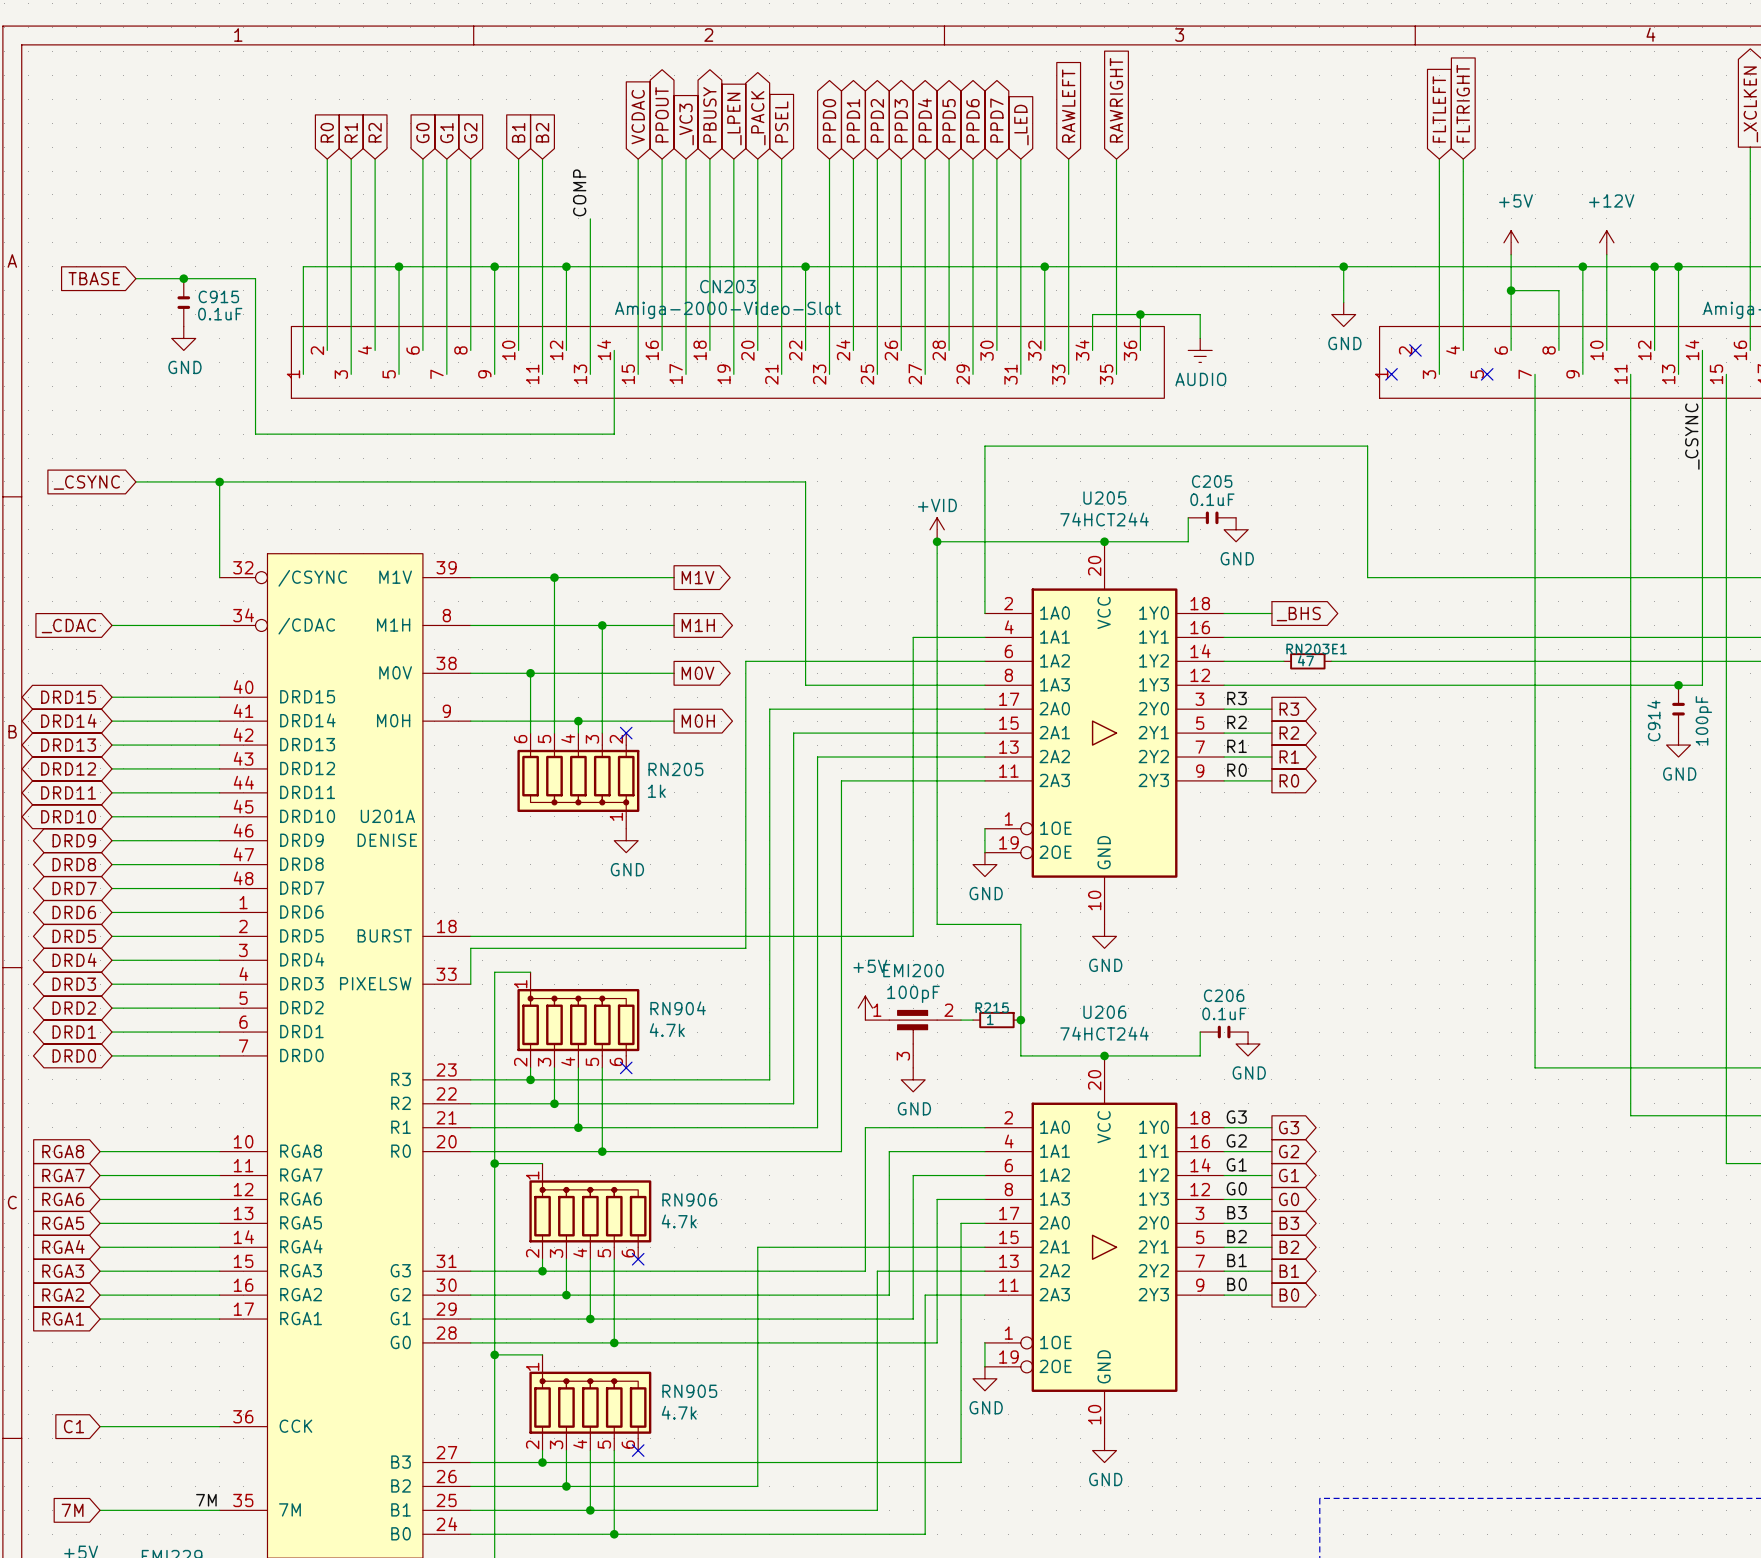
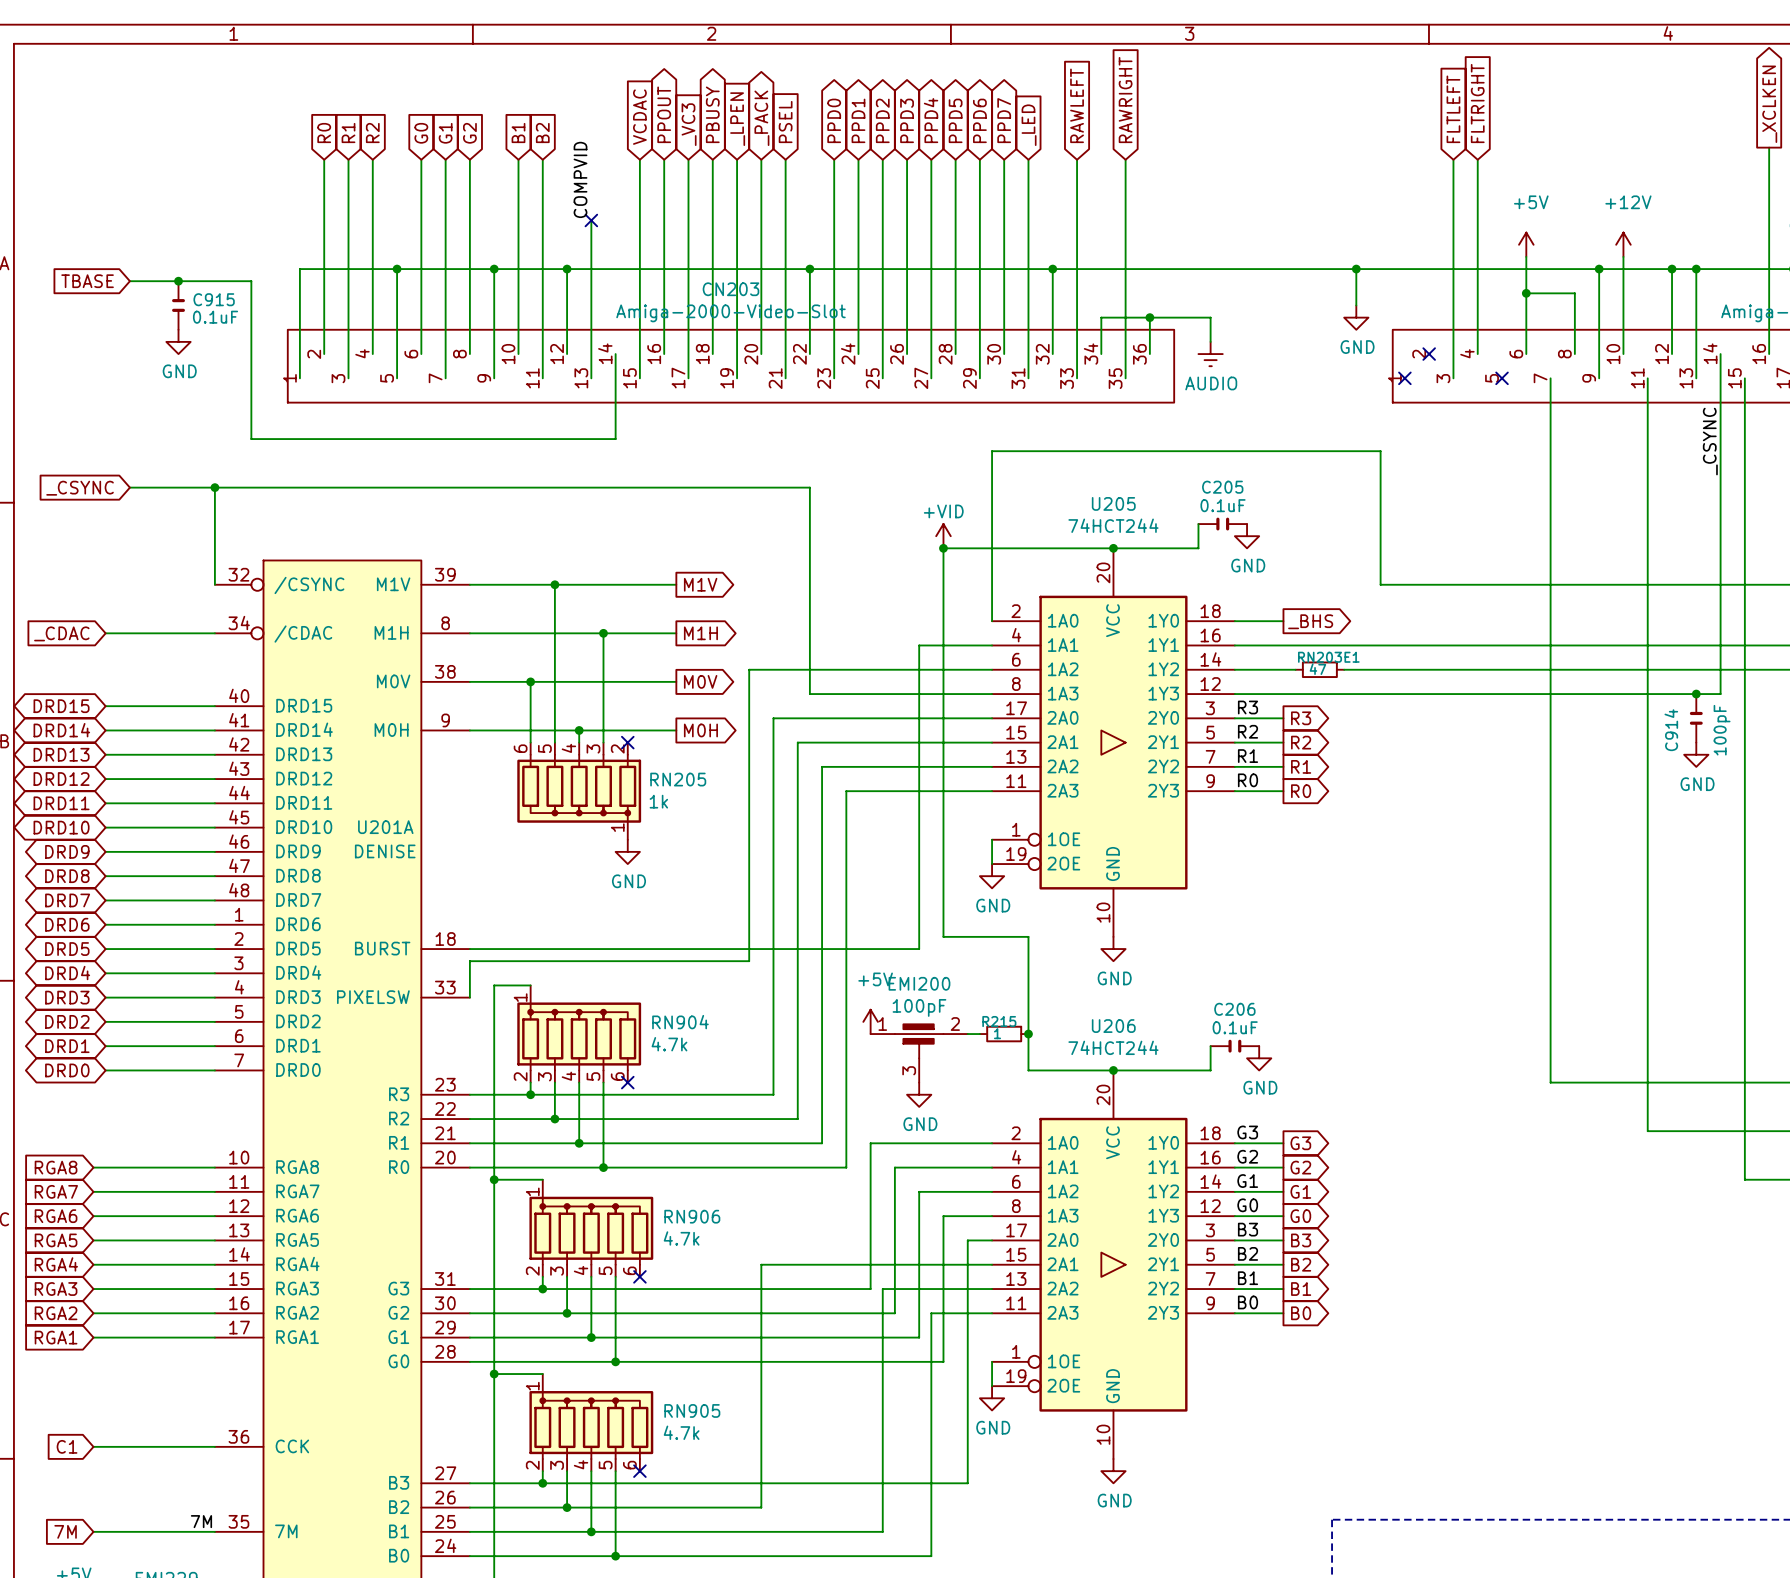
label: COMP (579, 192) -> COMPVID (580, 179)
no-connect mark: none -> (591, 220)

